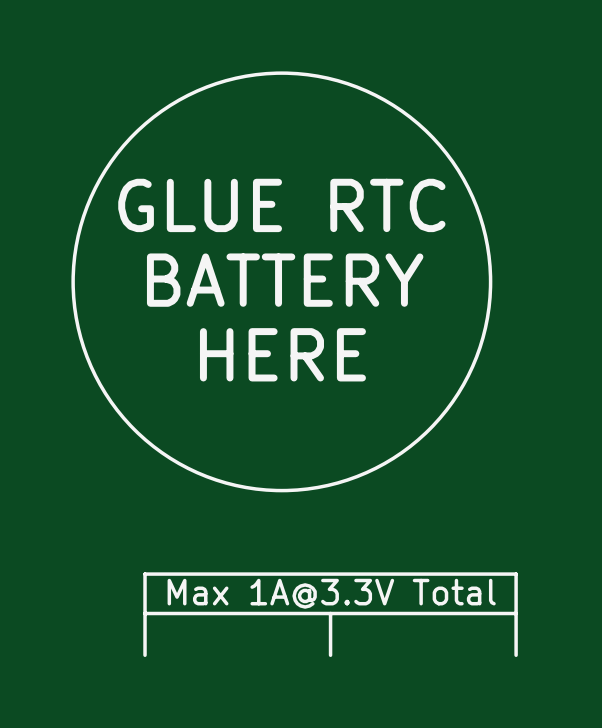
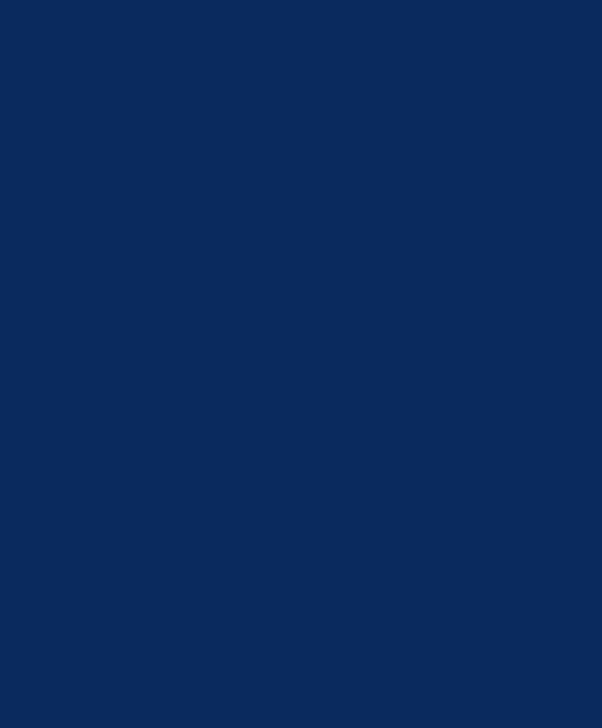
drawing: [71, 71, 493, 493] -> none
text: GLUE RTC (281, 205) -> none
text: BATTERY (285, 280) -> none
text: HERE (282, 354) -> none
text: Max 1A@3.3V Total (331, 593) -> none
line: (145, 613) (516, 613) -> none
line: (330, 613) (330, 655) -> none
line: (145, 655) (145, 574) (516, 574) (516, 655) -> none

